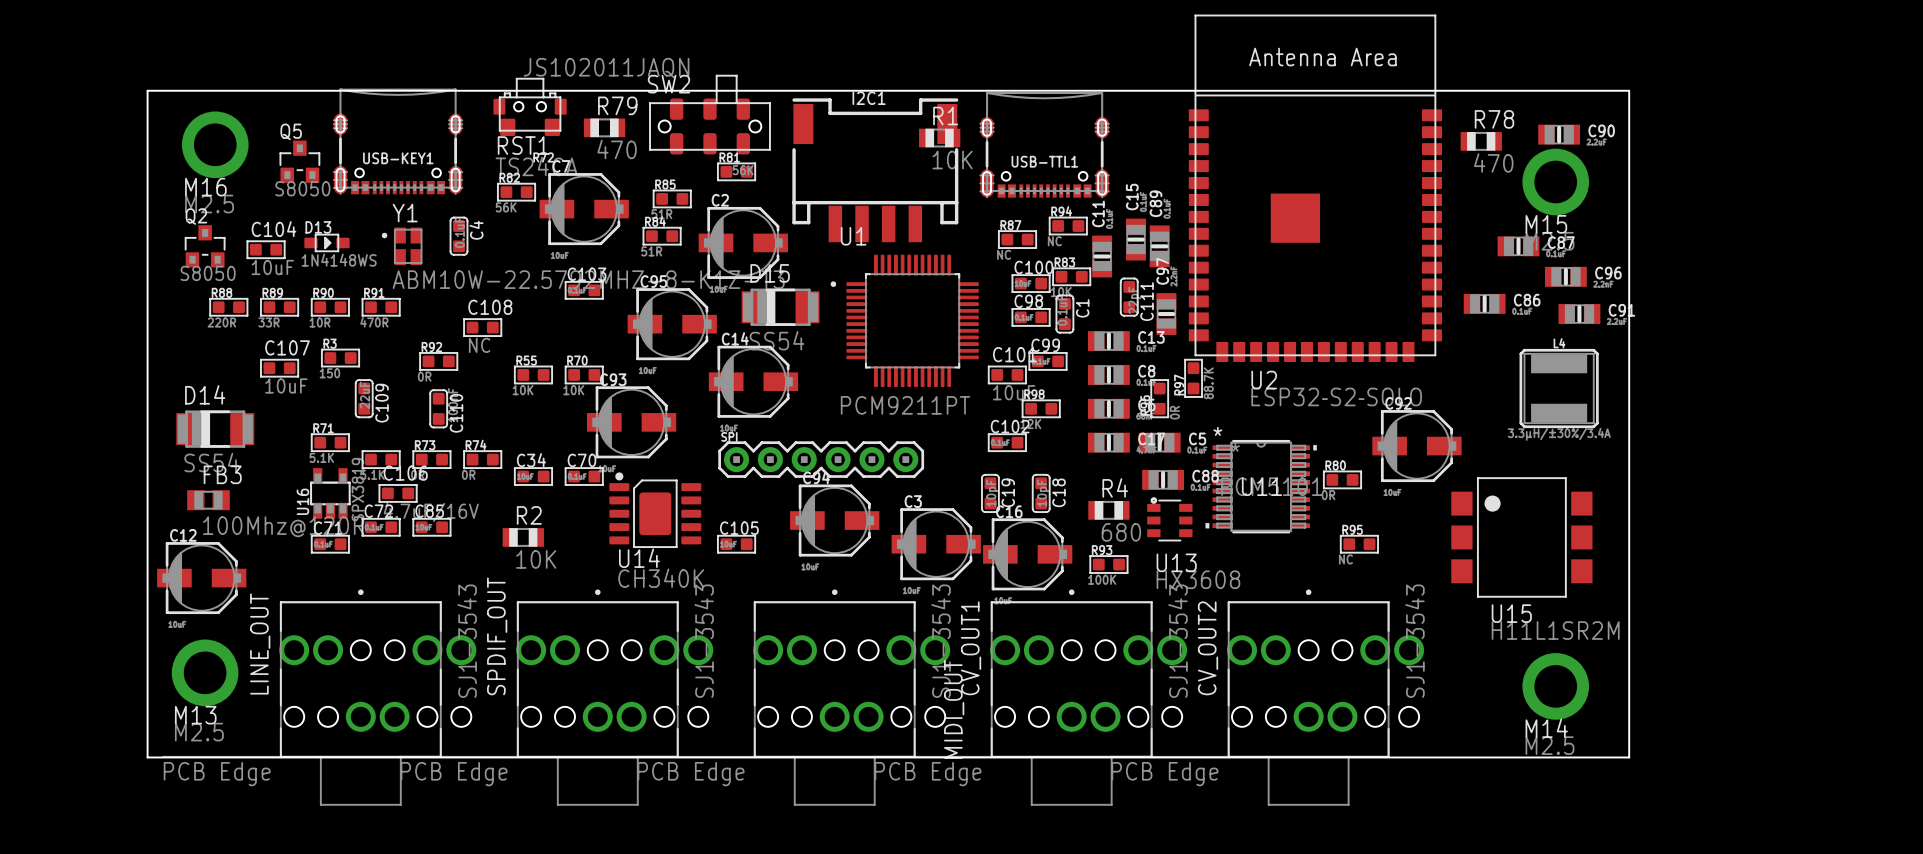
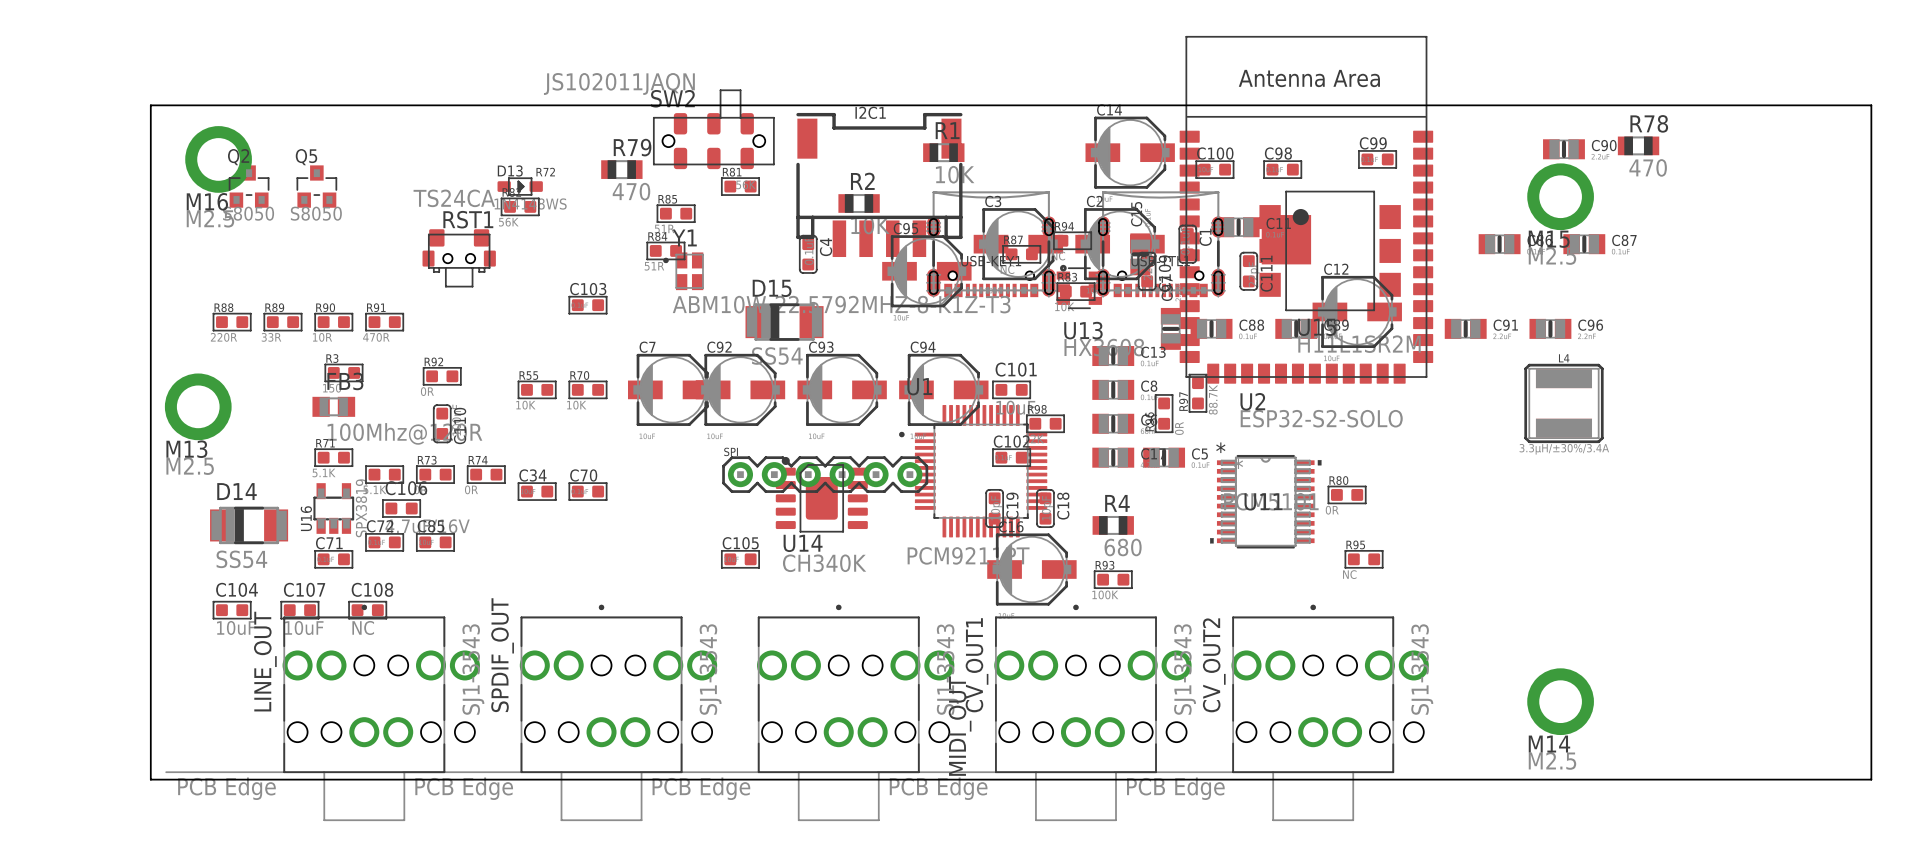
board edge: (1629, 90) (1629, 757) (147, 757) -> (1634, 105) (1871, 105) (1871, 779) (150, 779) (150, 772)
RST1 rotation: 0° (530, 106) -> 180° (459, 258)
RST1 position: (530, 106) -> (459, 258)
R79 position: (604, 127) -> (621, 169)
USB-KEY1 position: (398, 141) -> (991, 244)
R78 position: (1481, 141) -> (1638, 145)
USB-TTL1 position: (1044, 144) -> (1160, 244)
Q5 position: (299, 161) -> (316, 186)
U2 position: (1315, 188) -> (1306, 209)
C7 position: (584, 209) -> (672, 389)
C4 position: (458, 236) -> (808, 254)
D13 position: (326, 242) -> (520, 186)
C2 position: (743, 242) -> (1120, 244)
Q2 position: (205, 246) -> (249, 186)
Y1 position: (402, 246) -> (683, 271)
C89 rotation: 0° (1159, 246) -> 90° clockwise (1296, 328)
C89 position: (1159, 246) -> (1296, 328)
C87 position: (1518, 246) -> (1584, 244)
C104 position: (266, 249) -> (232, 610)
C11 rotation: 0° (1102, 256) -> 90° clockwise (1238, 227)
C11 position: (1102, 256) -> (1238, 227)
C96 position: (1565, 276) -> (1550, 328)
C100 position: (1031, 283) -> (1214, 169)
C111 position: (1129, 297) -> (1248, 271)
C86 position: (1484, 303) -> (1499, 244)
C1 position: (1064, 314) -> (1187, 244)
C91 position: (1579, 314) -> (1465, 328)
C98 position: (1031, 317) -> (1282, 169)
U1 position: (904, 320) -> (973, 471)
C95 position: (672, 324) -> (926, 271)
C108 position: (482, 327) -> (367, 610)
C99 position: (1047, 361) -> (1377, 159)
C107 position: (279, 368) -> (299, 610)
C14 position: (753, 381) -> (1130, 152)
C109 position: (364, 398) -> (1147, 271)
C93 position: (631, 422) -> (842, 389)
D14 position: (215, 429) -> (249, 525)
C92 position: (1416, 446) -> (740, 389)
C88 position: (1163, 479) -> (1211, 328)
FB3 position: (208, 500) -> (333, 406)
U14 position: (655, 510) -> (821, 494)
U13 position: (1169, 519) -> (1079, 286)
C94 position: (834, 520) -> (943, 389)
R2 position: (523, 537) -> (859, 203)
U15 position: (1521, 537) -> (1330, 250)
C3 position: (936, 544) -> (1018, 244)
C12 position: (201, 578) -> (1357, 311)
M13 position: (205, 672) -> (198, 406)

